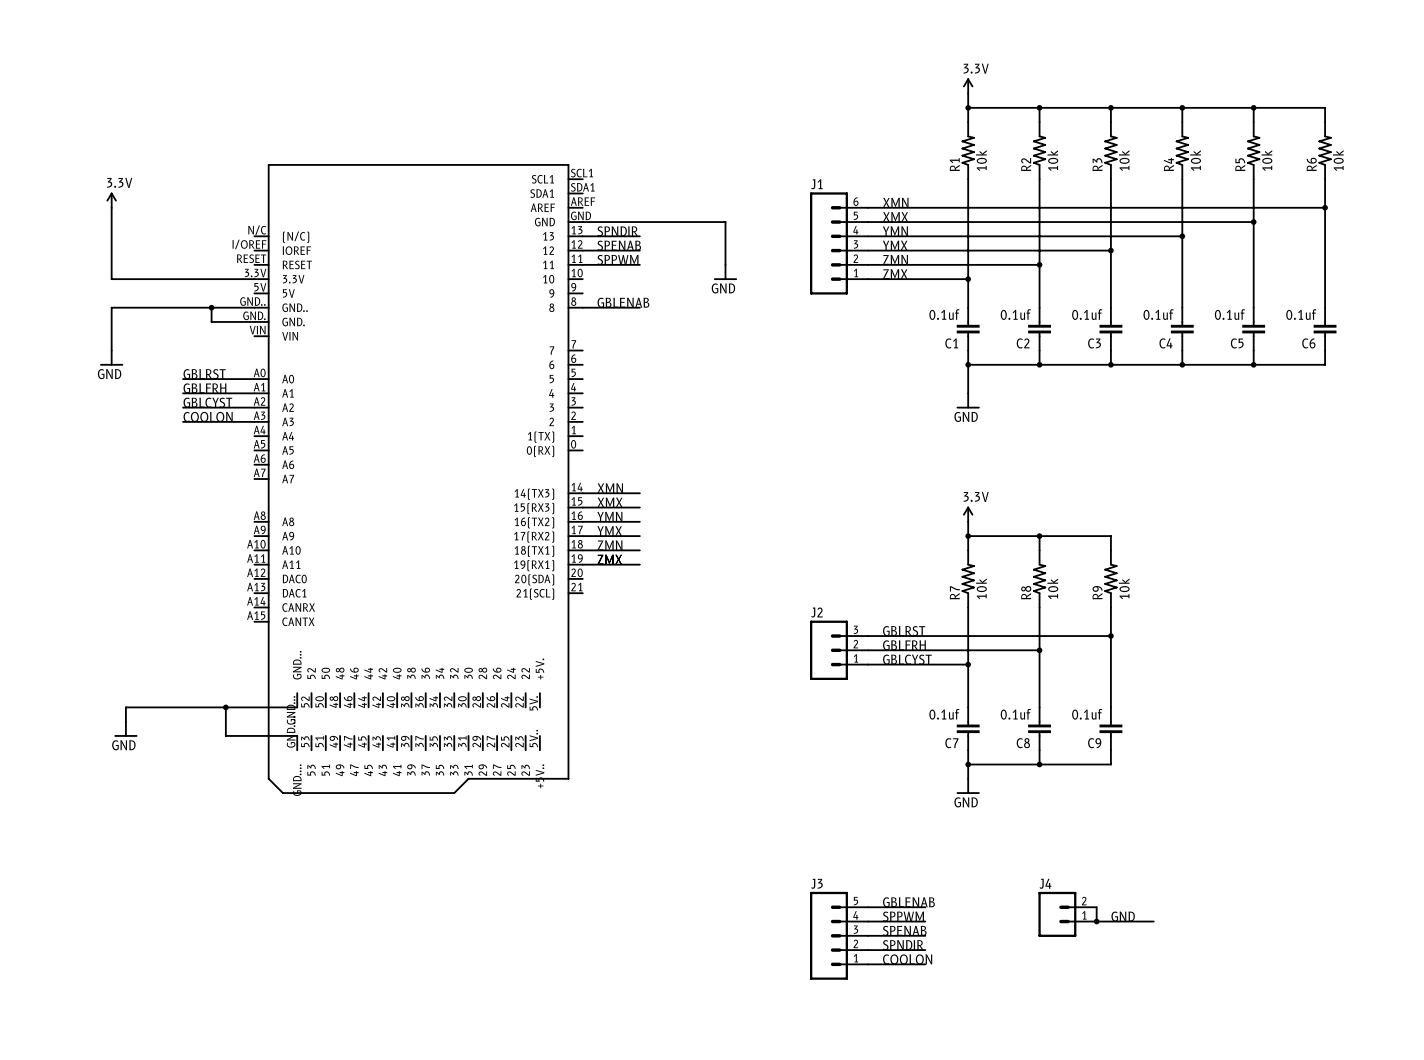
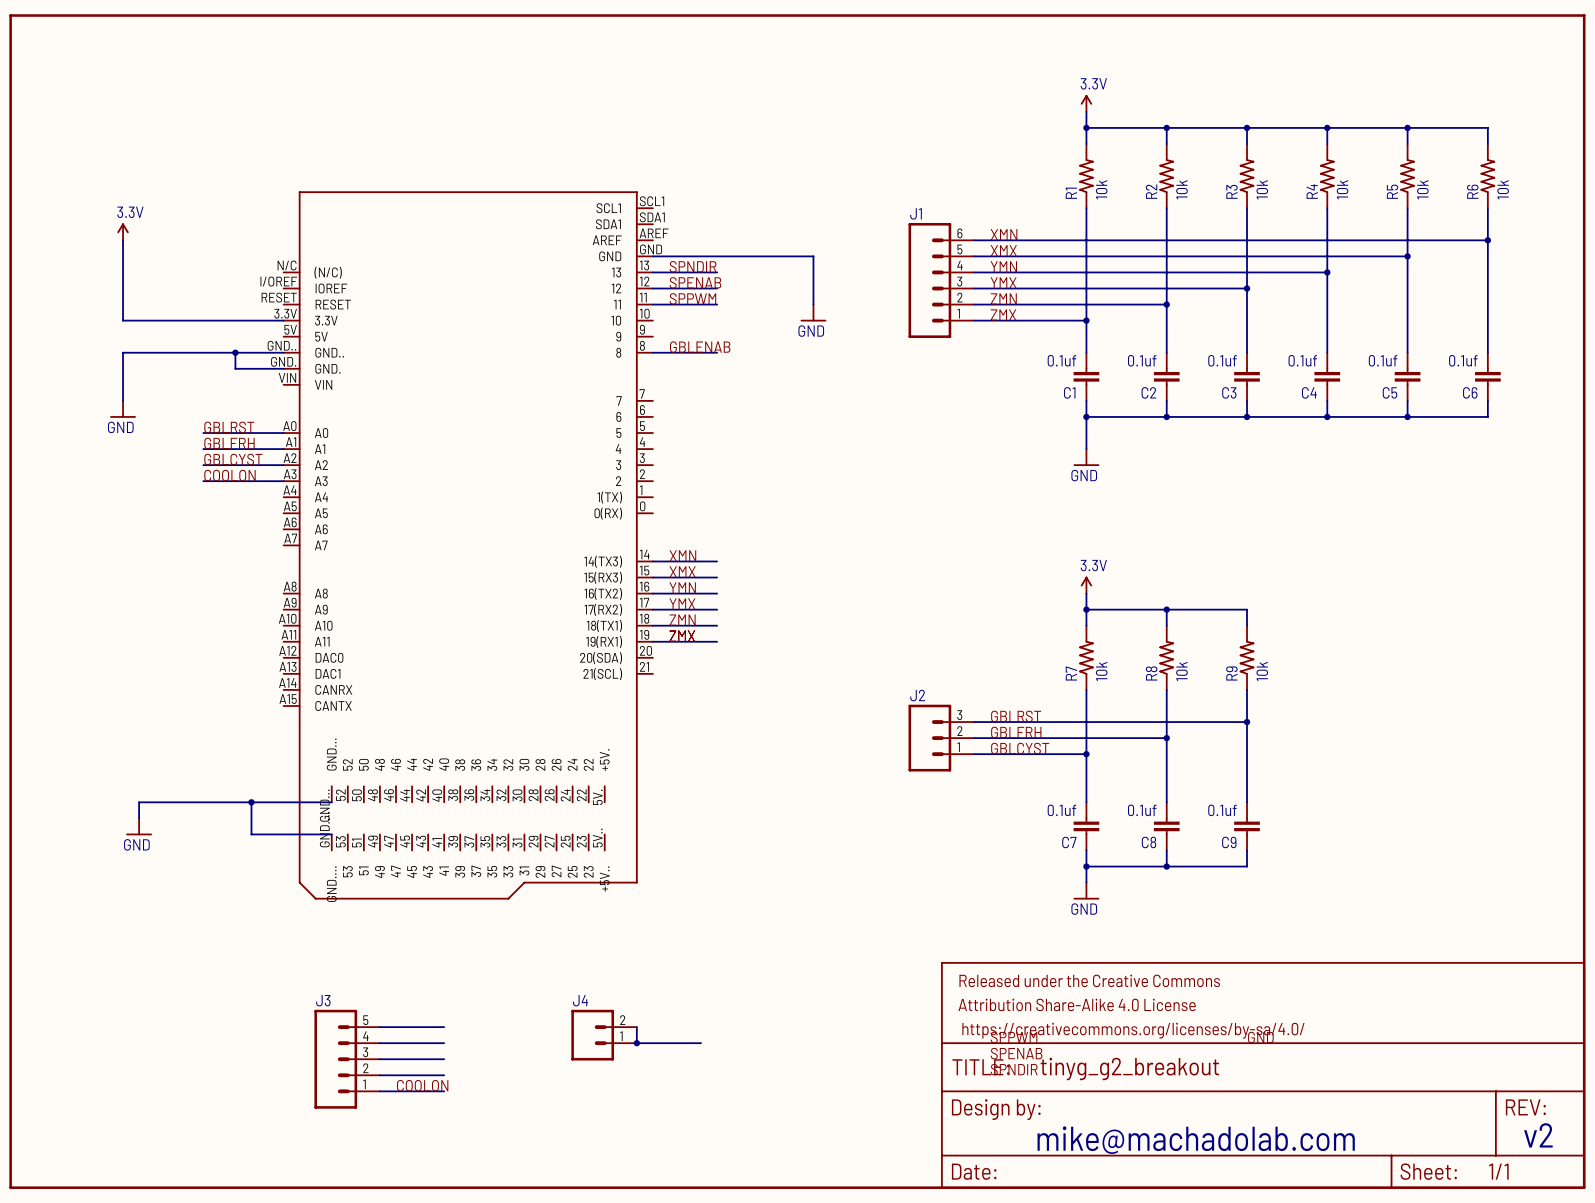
part: none -> (797, 601)
label: GBLENAB (908, 902) -> none
wire: none -> (379, 1027) (444, 1027)
wire: none -> (636, 1027) (636, 1043) (701, 1043)
wire: (868, 907) (925, 907) -> none
J4 position: (1067, 914) -> (604, 1035)
wire: none -> (379, 1043) (444, 1043)
junction: none -> (636, 1043)
junction: (1096, 921) -> none
wire: none -> (379, 1059) (444, 1059)
J3 position: (839, 935) -> (347, 1059)
wire: (868, 935) (925, 935) -> none
wire: none -> (379, 1075) (444, 1075)
wire: (868, 950) (925, 950) -> none
part: none -> (1263, 1075)
label: none -> COOLON (422, 1085)
label: COOLON (907, 959) -> none
wire: none -> (379, 1091) (444, 1091)
text: none -> v2 (1538, 1135)
text: none -> mike@machadolab.com (1196, 1140)

